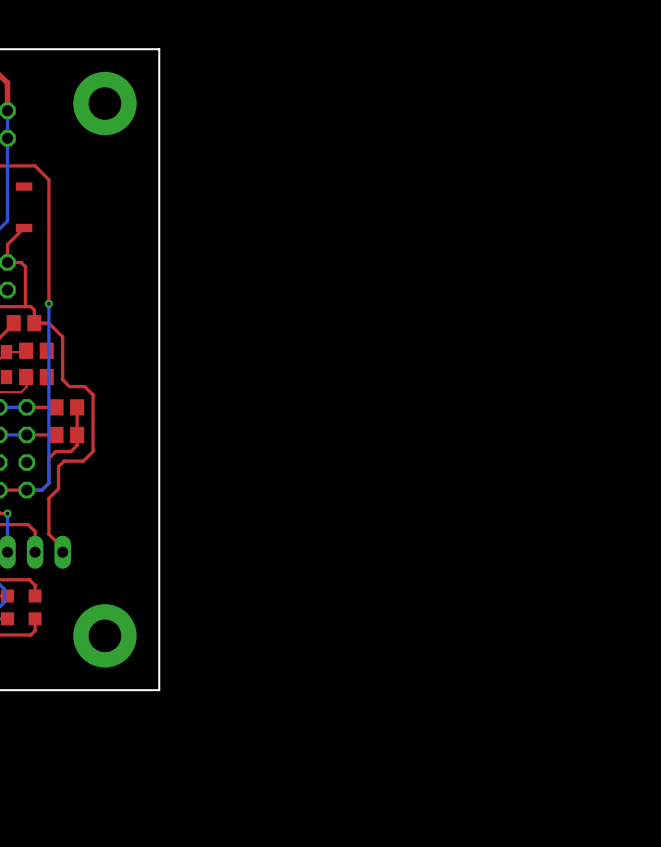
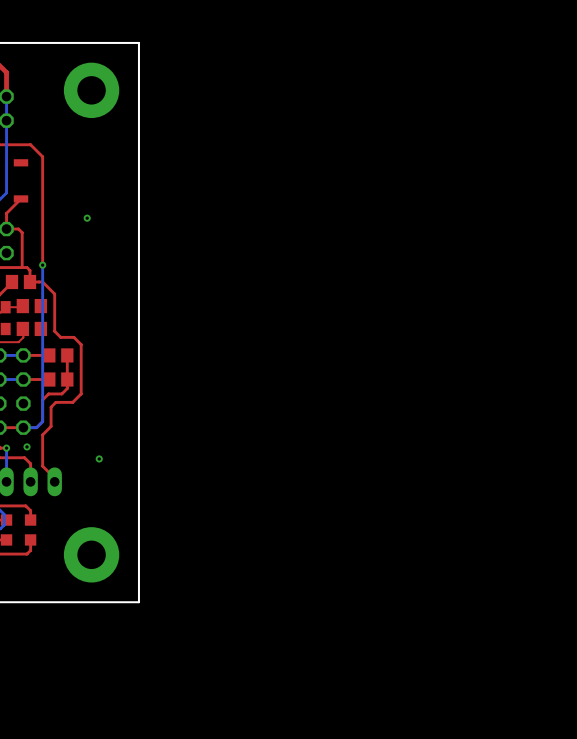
via: none -> (87, 218)
via: none -> (27, 446)
via: none -> (99, 458)

